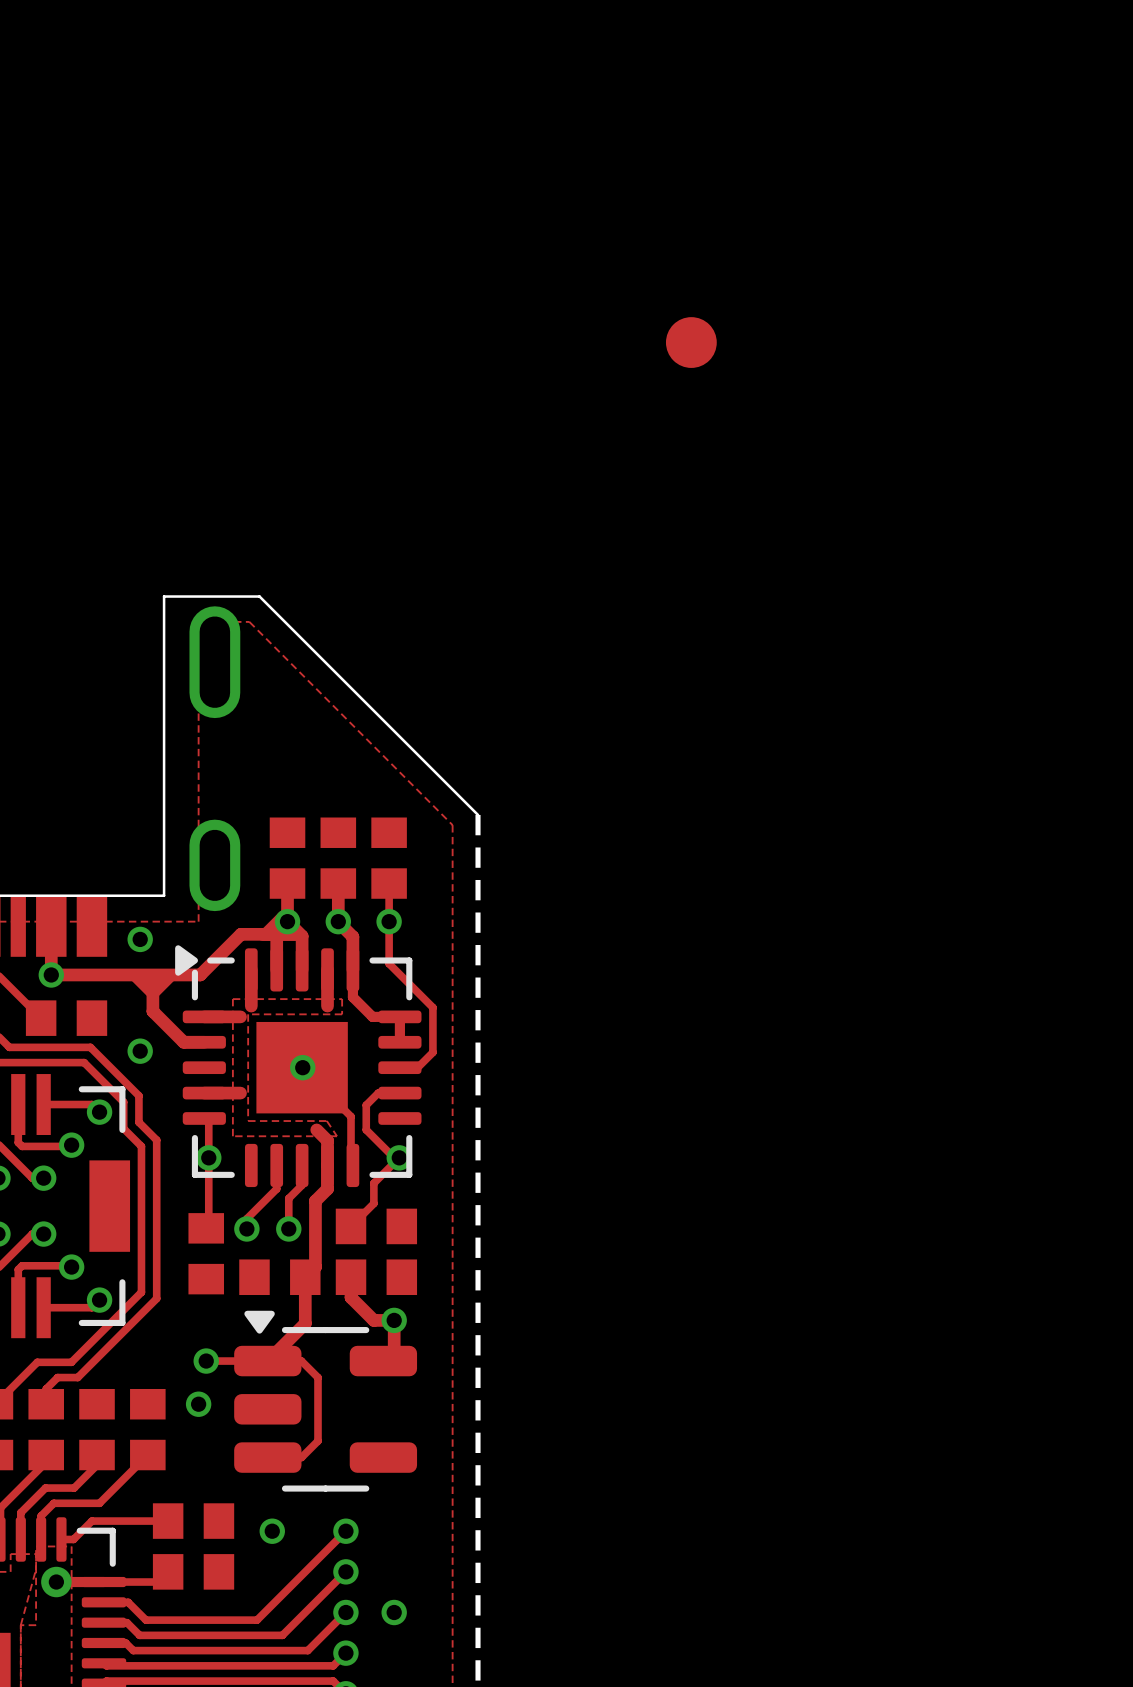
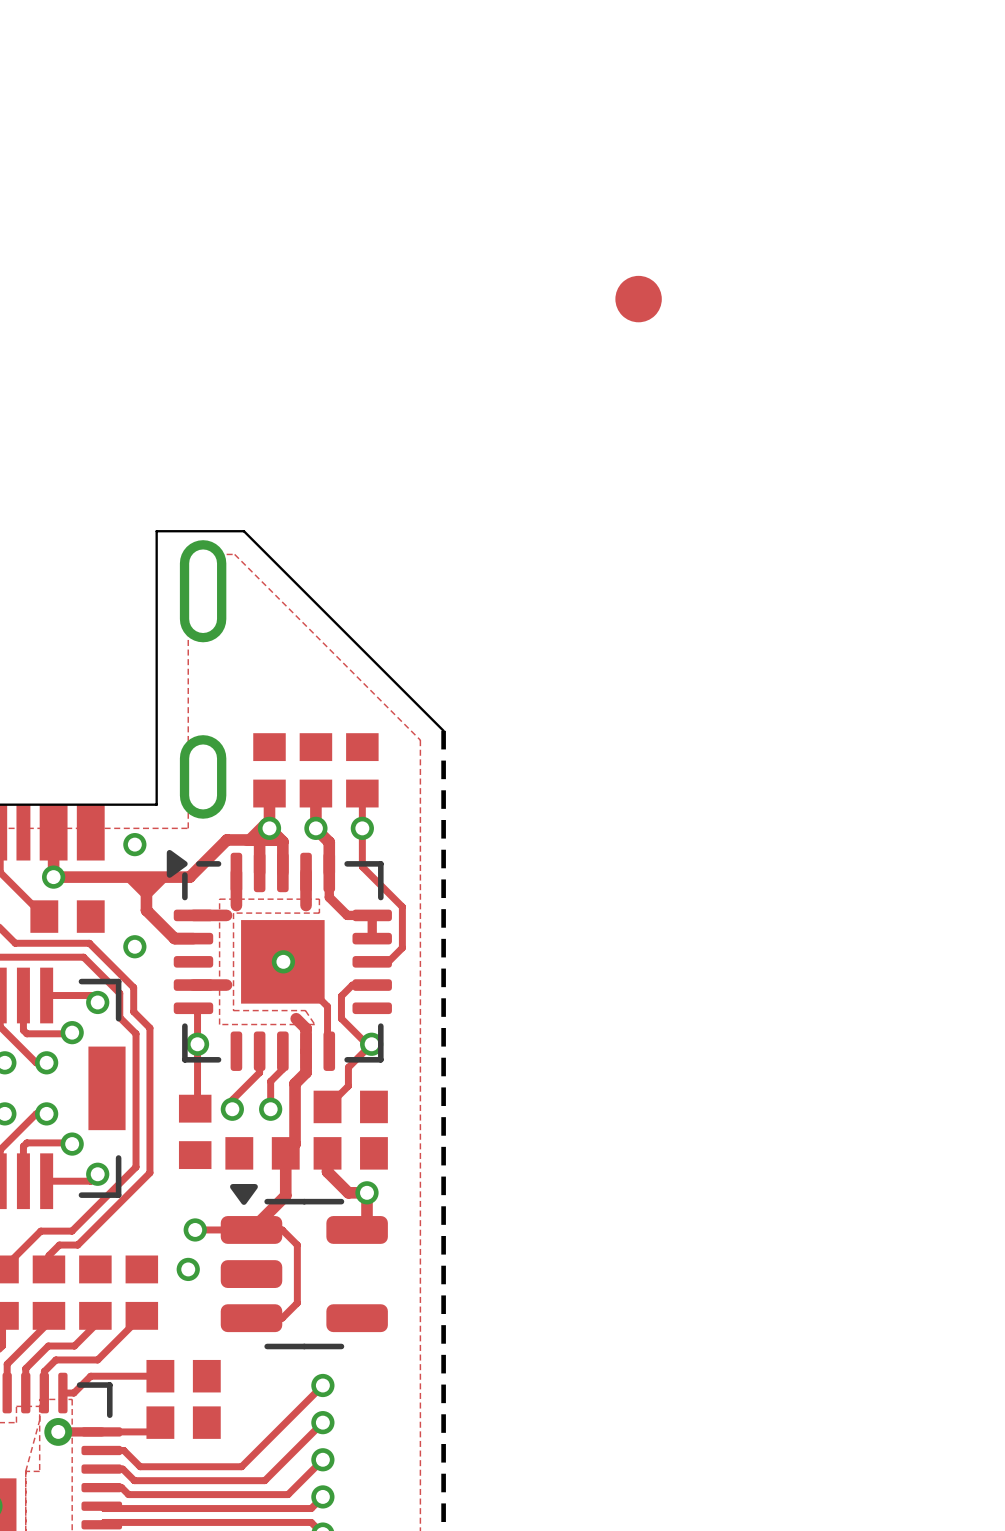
via: (272, 1531) -> none
via: (394, 1612) -> none

